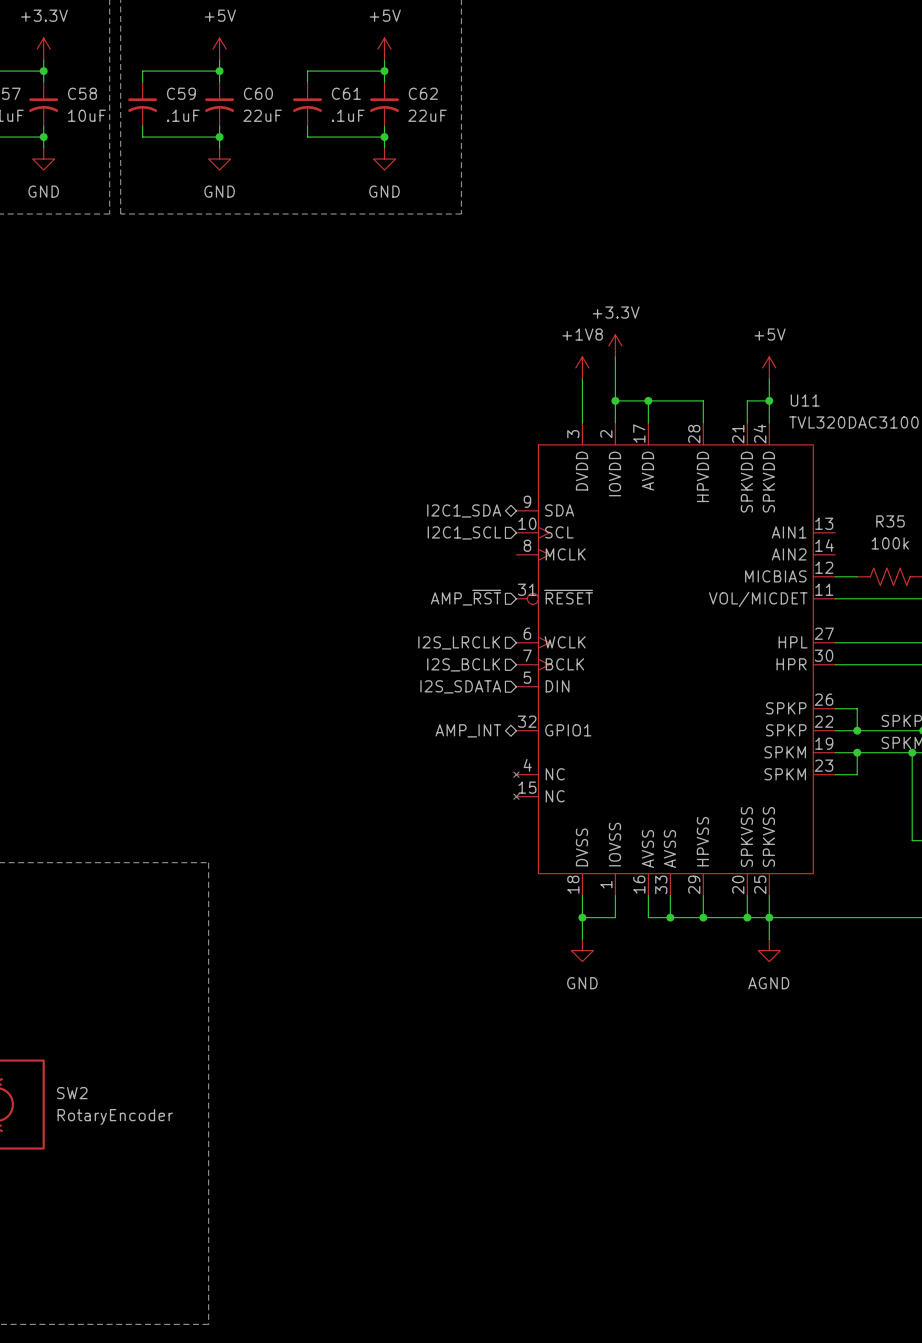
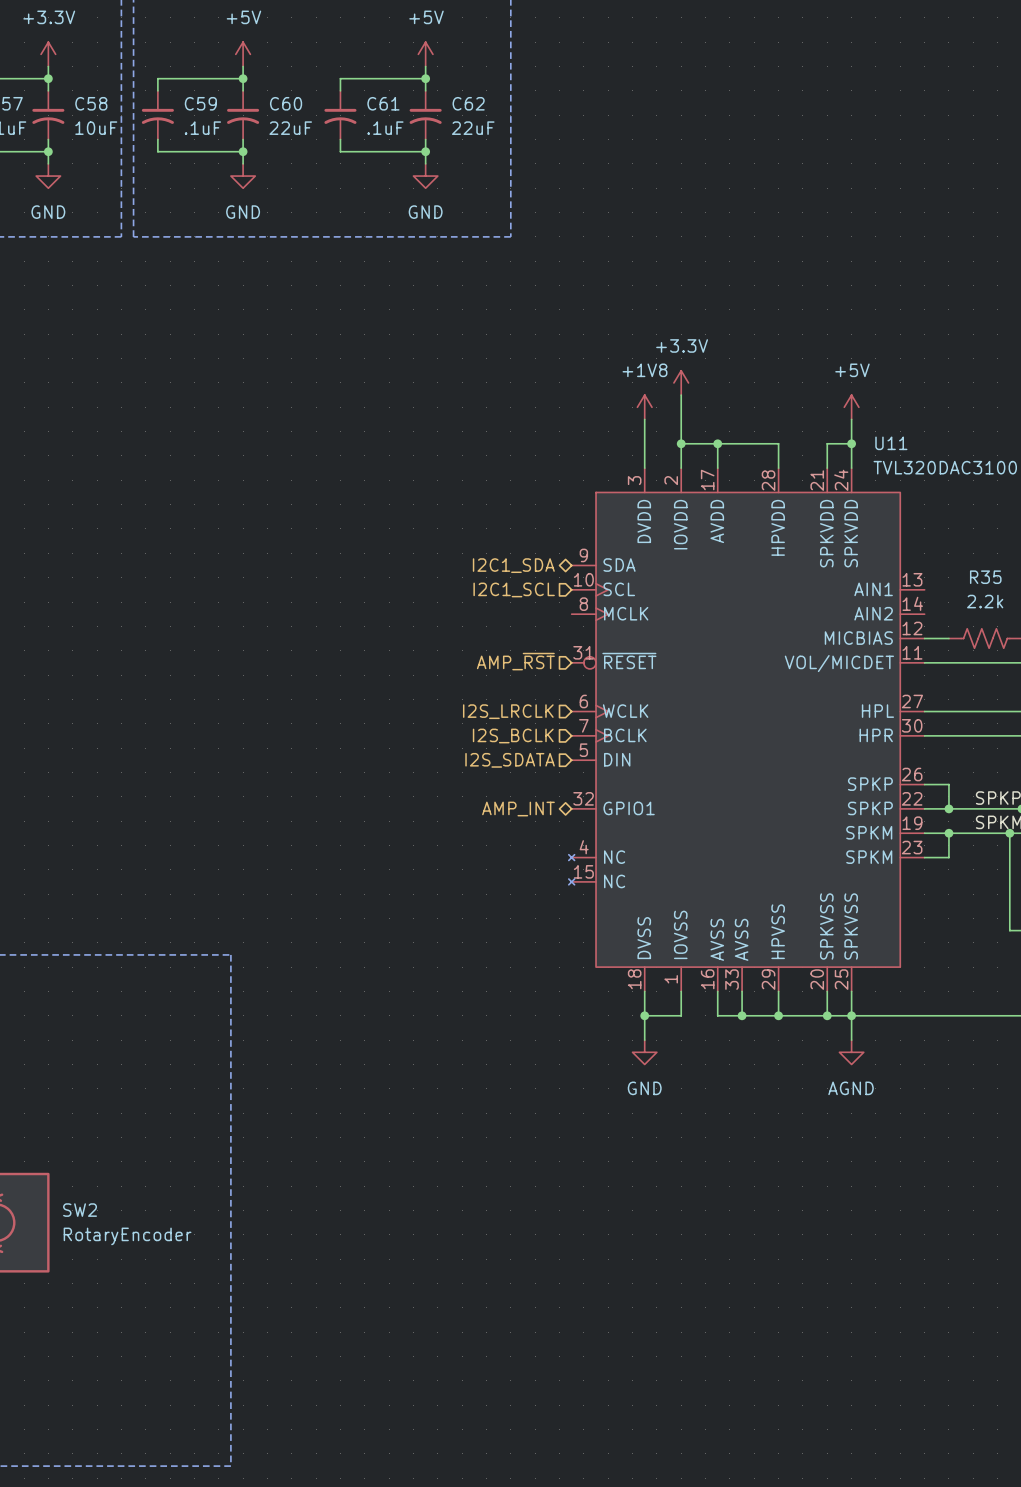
R35 value: 100k (890, 543) -> 2.2k (985, 601)

